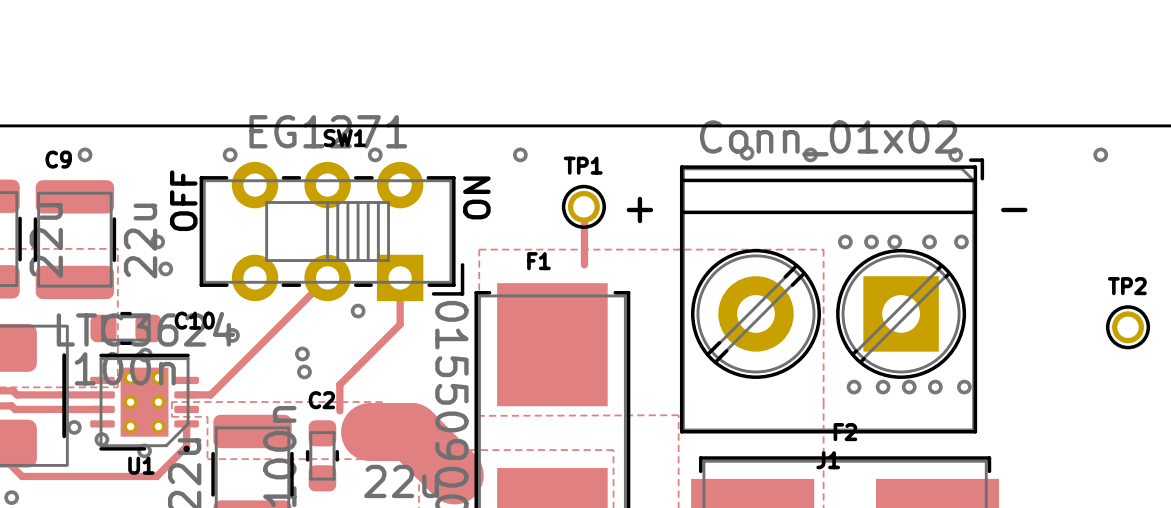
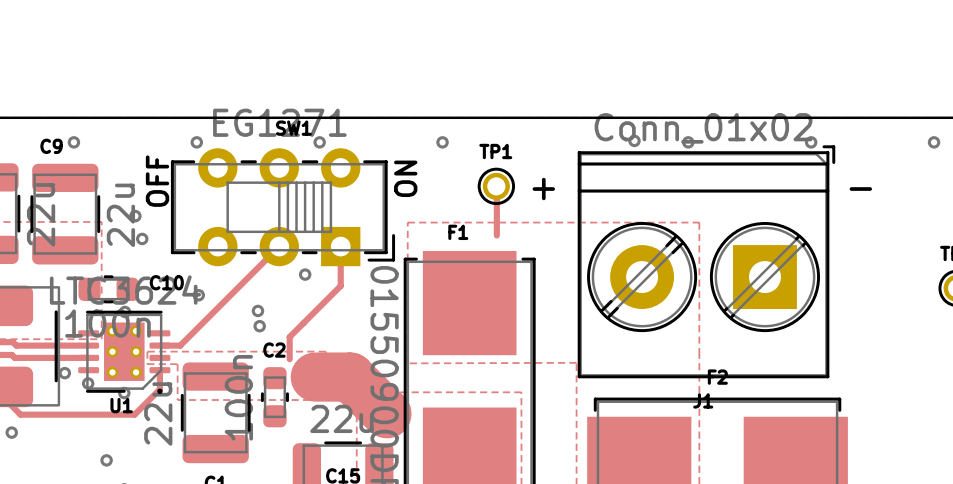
via: (845, 241) -> none
via: (871, 241) -> none
via: (894, 241) -> none
via: (929, 241) -> none
via: (961, 241) -> none
via: (854, 387) -> none
via: (883, 387) -> none
via: (909, 387) -> none
via: (935, 387) -> none
via: (964, 387) -> none

